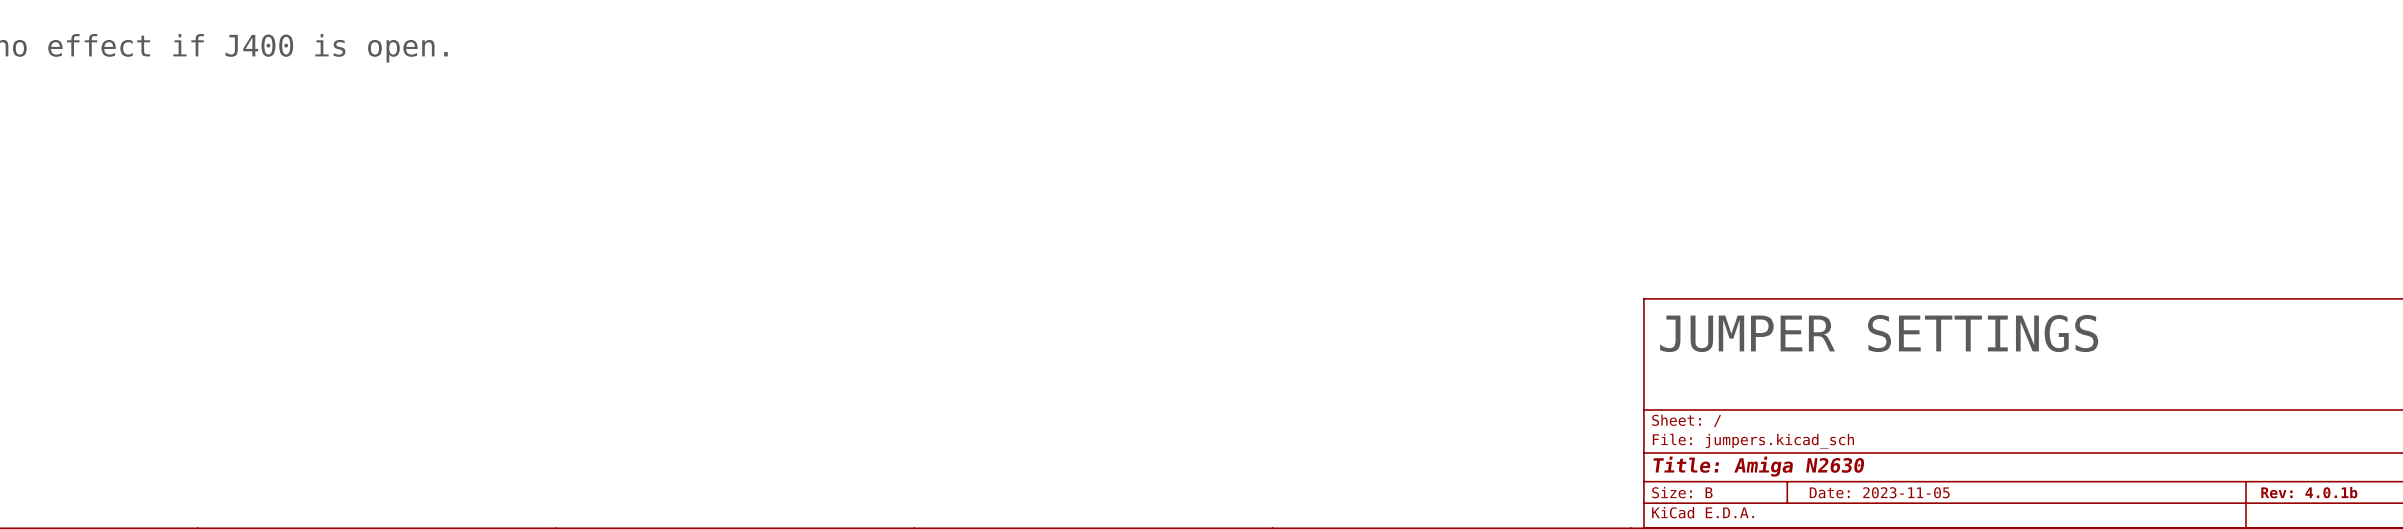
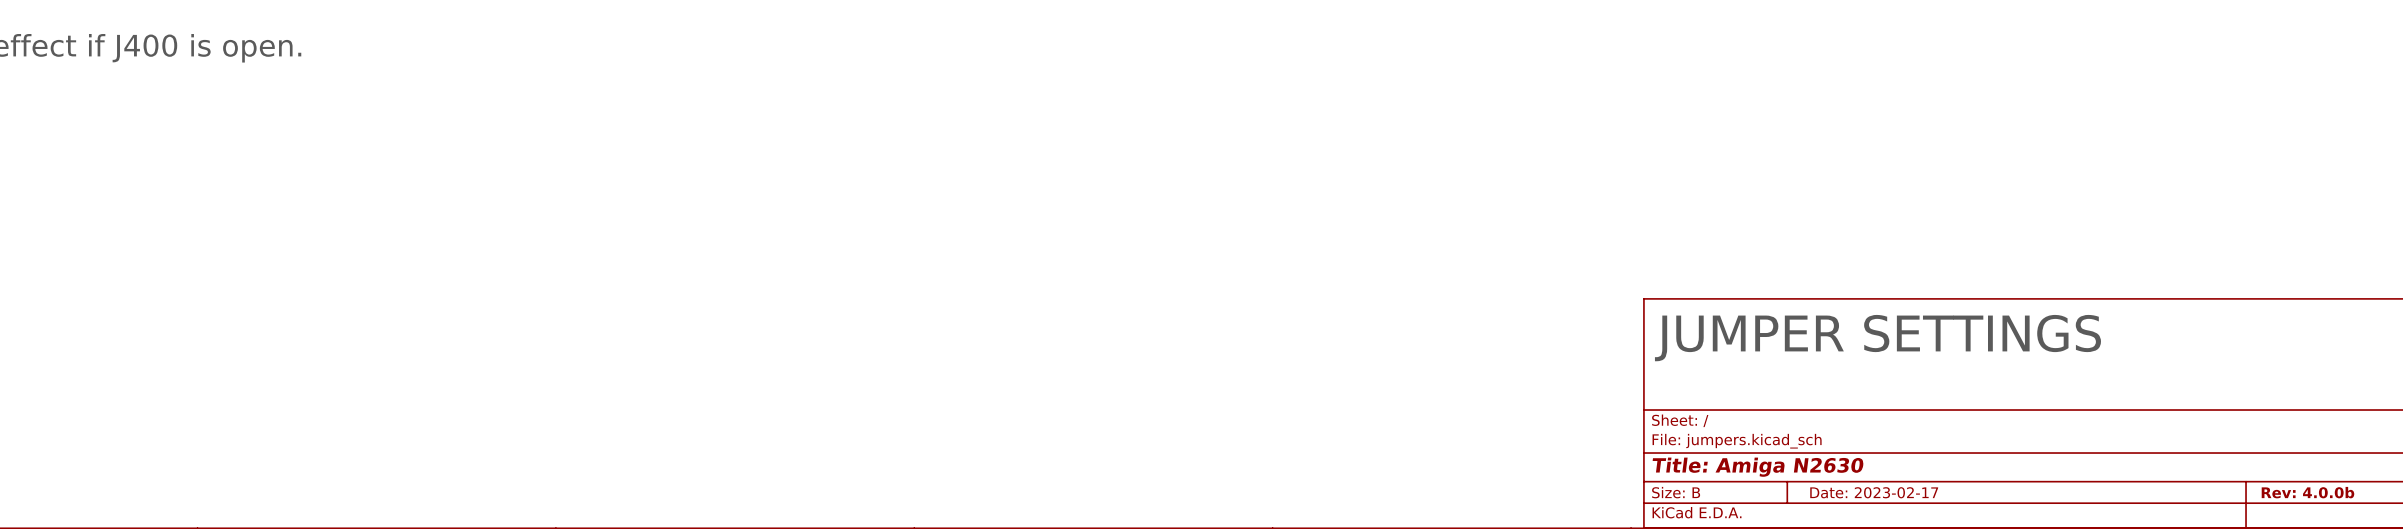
title block: Date: 2023-11-05 (1879, 492) -> Date: 2023-02-17 (1874, 492)
title block: Rev: 4.0.1b (2309, 492) -> Rev: 4.0.0b (2307, 492)

